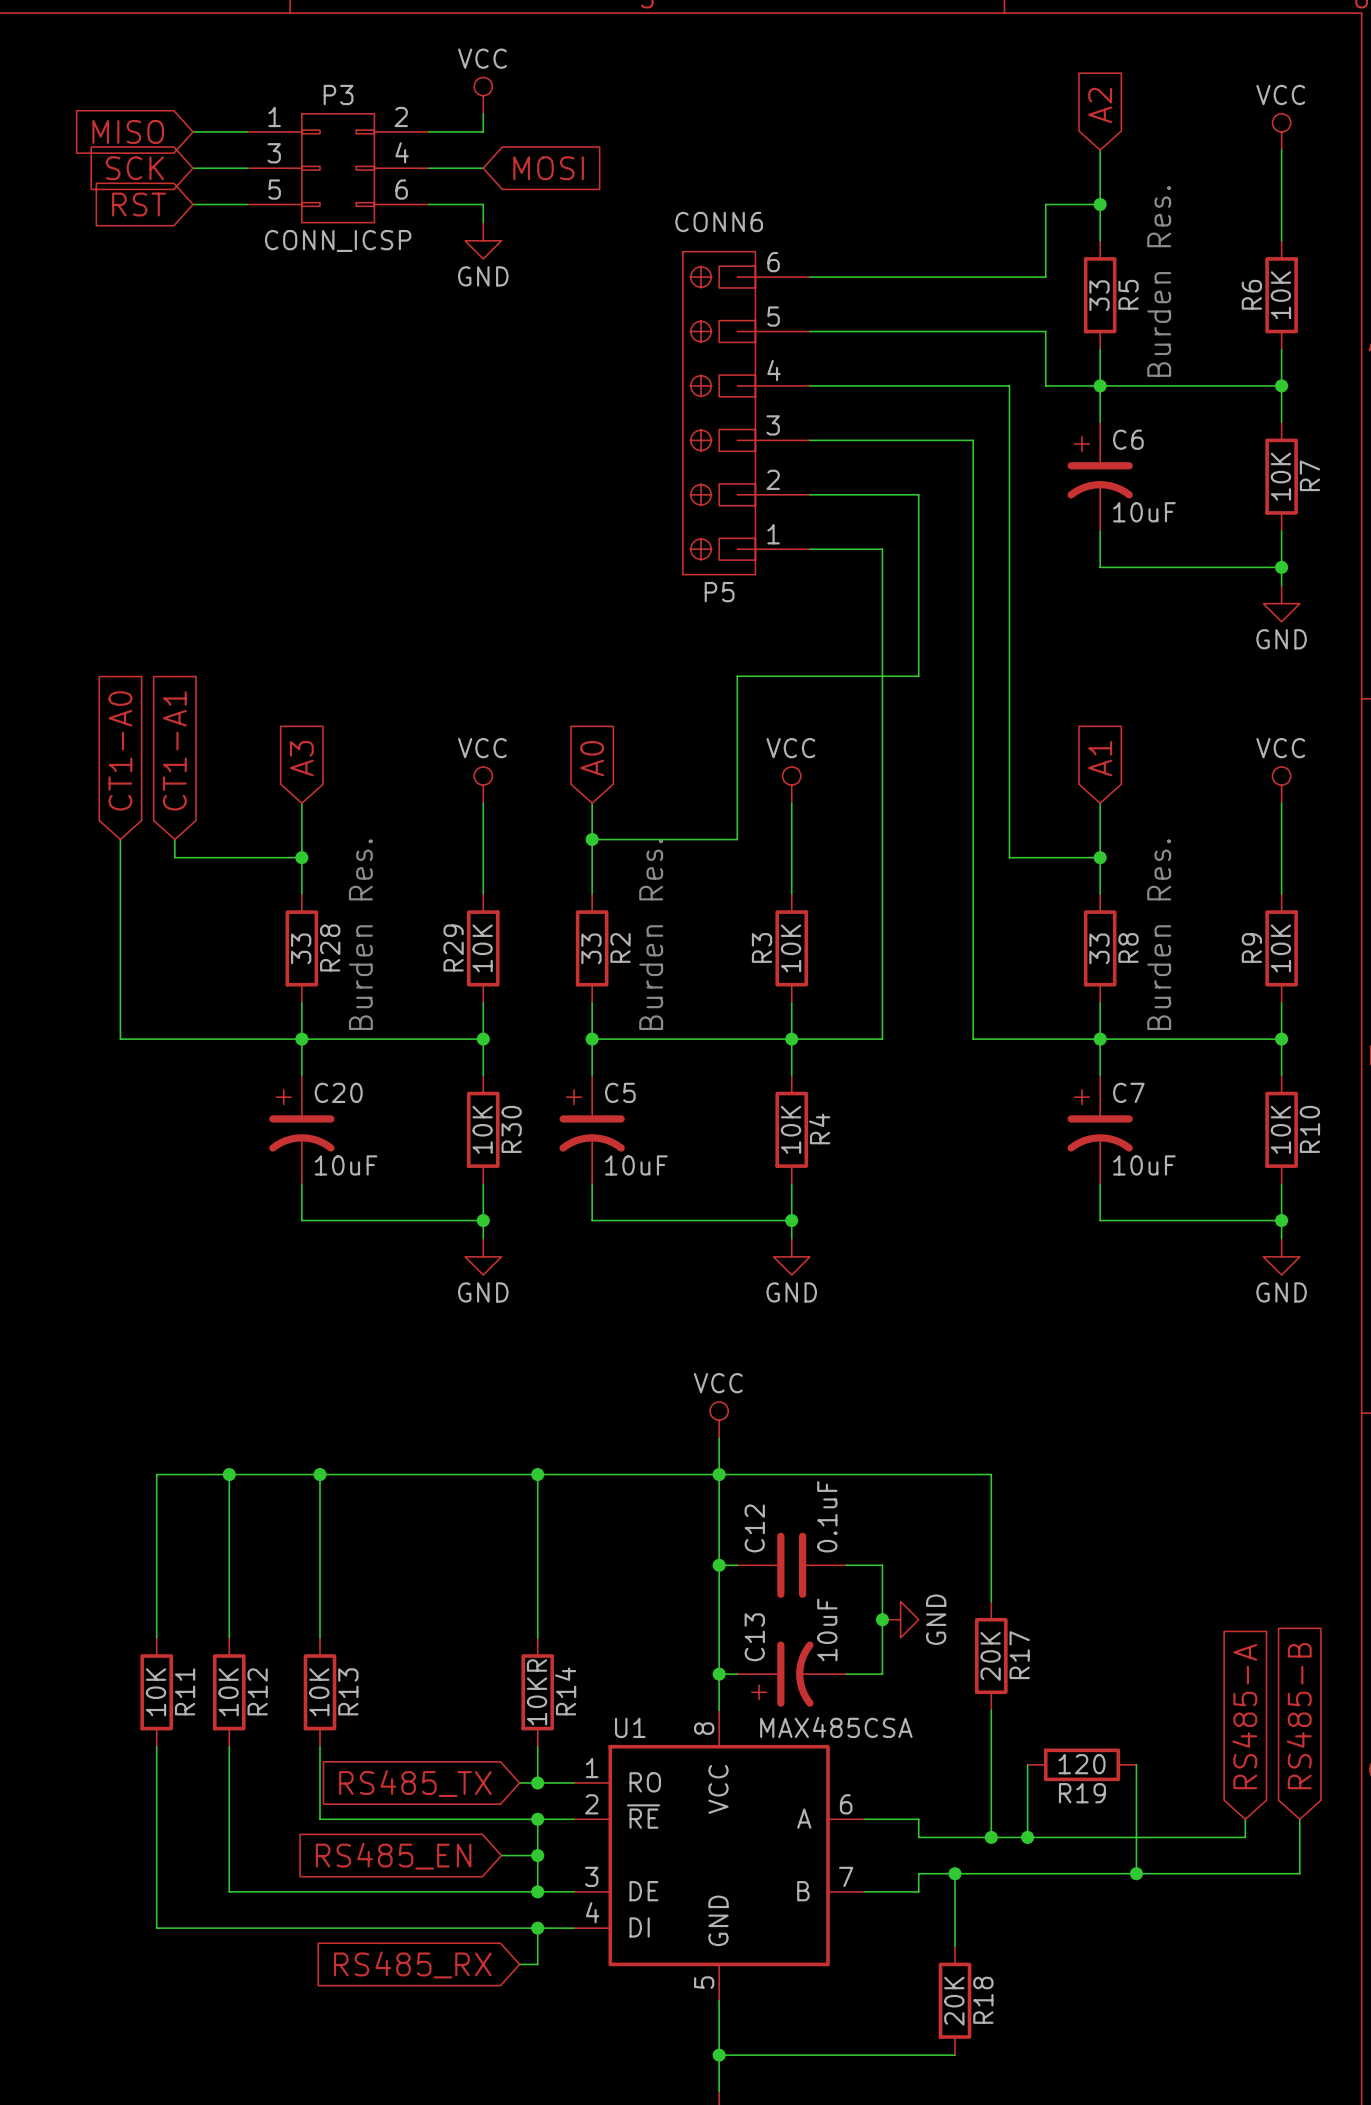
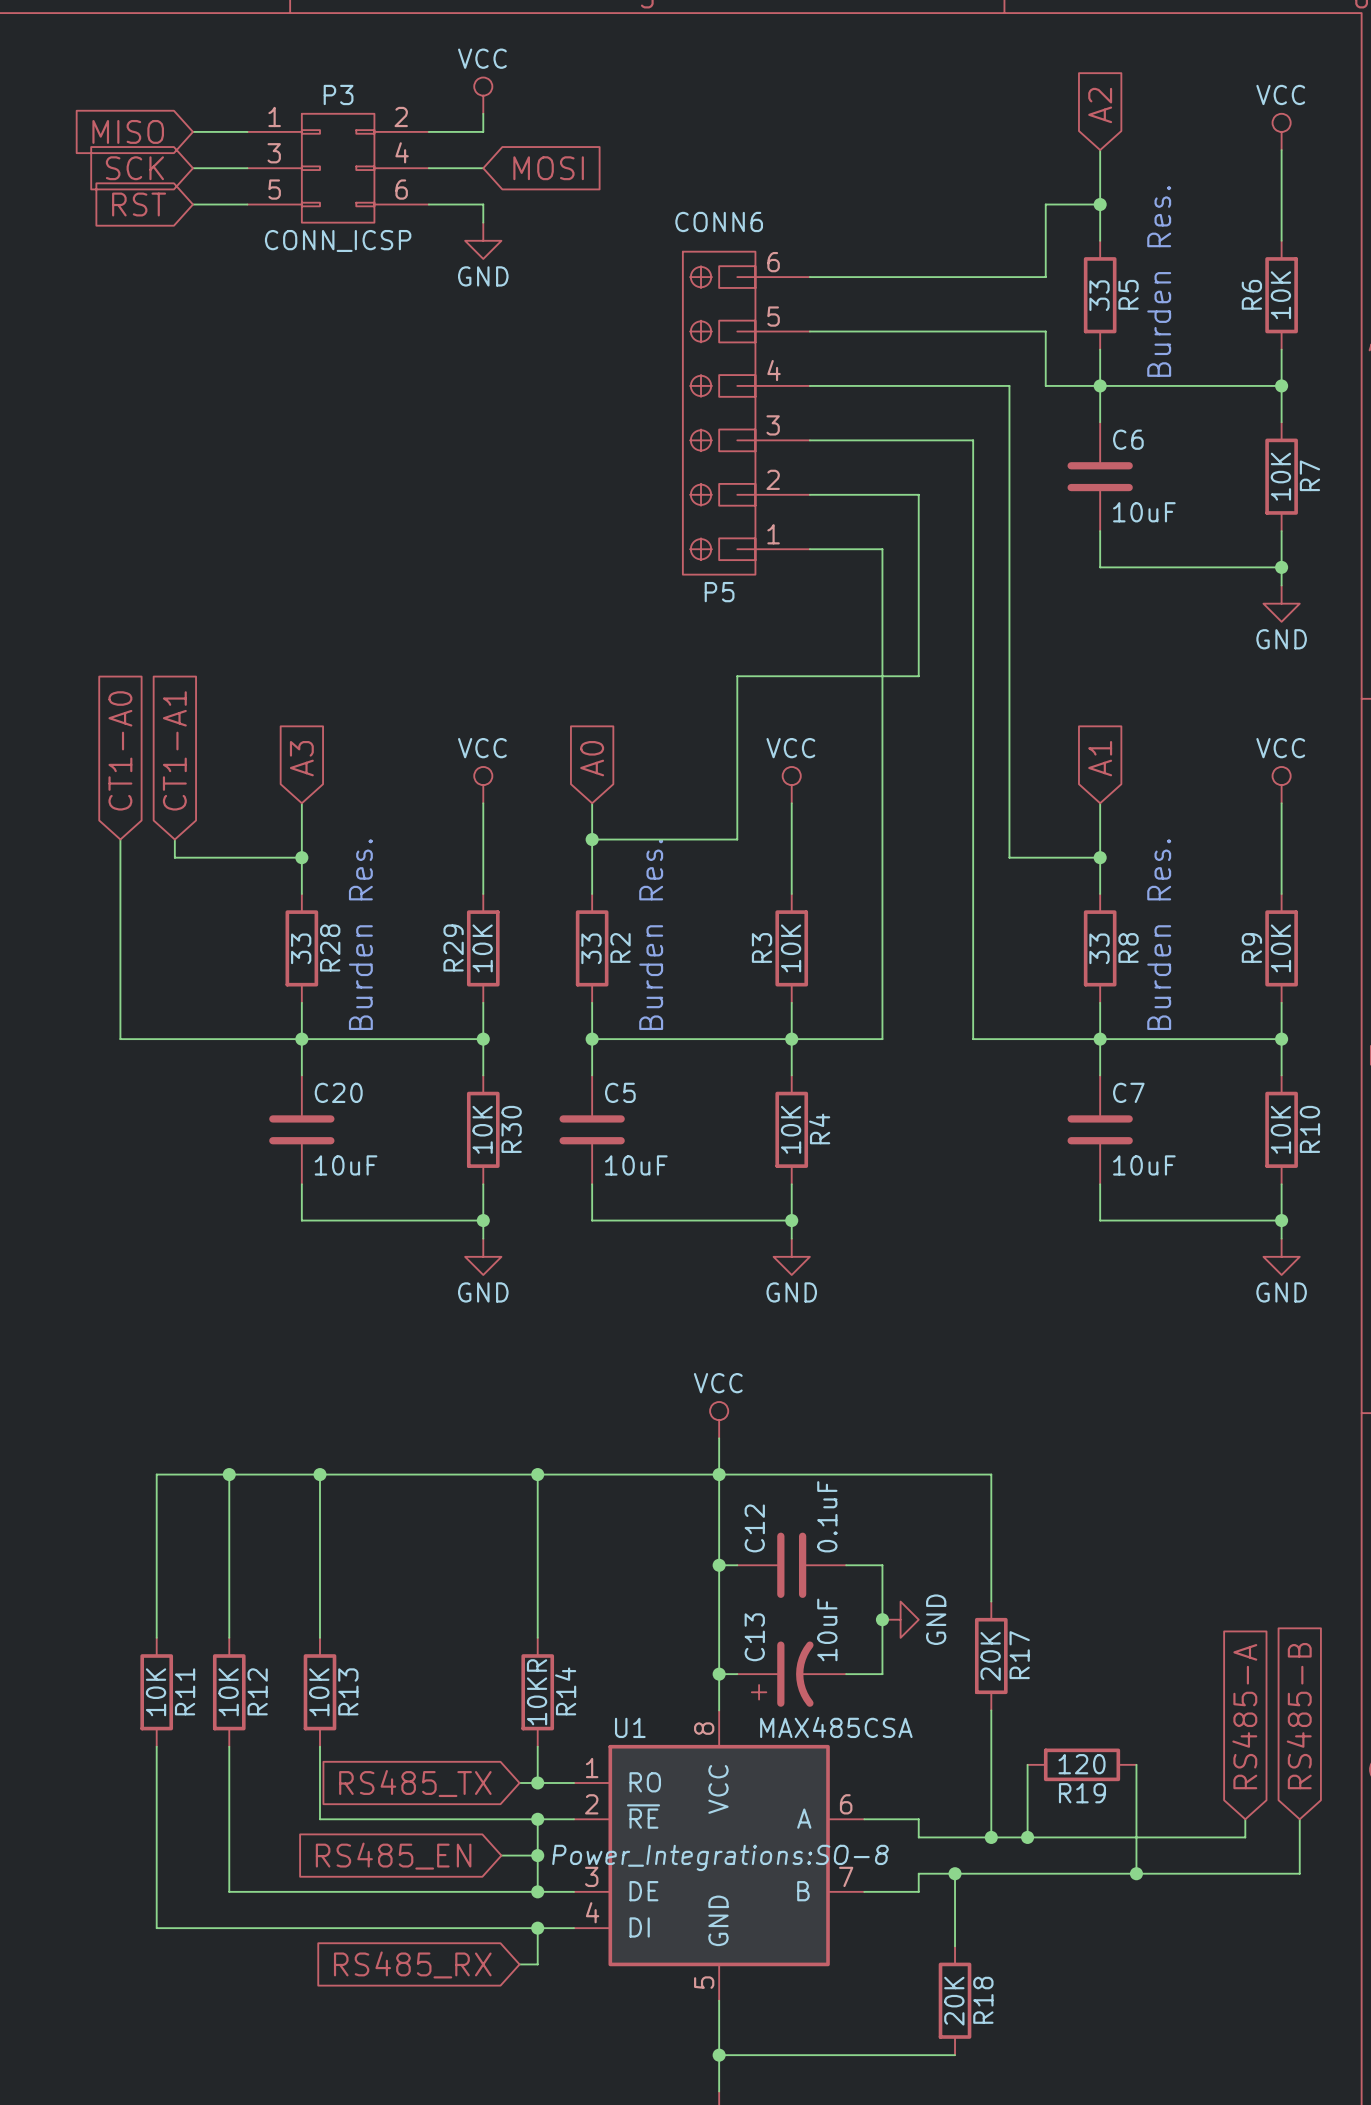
C6 symbol: [1067, 422, 1133, 532] -> [1067, 422, 1133, 532]
C20 symbol: [269, 1075, 335, 1185] -> [269, 1075, 335, 1185]
C5 symbol: [559, 1075, 625, 1185] -> [559, 1075, 625, 1185]
C7 symbol: [1067, 1075, 1133, 1185] -> [1067, 1075, 1133, 1185]
U1 text: none -> Power_Integrations:SO-8 (720, 1857)

